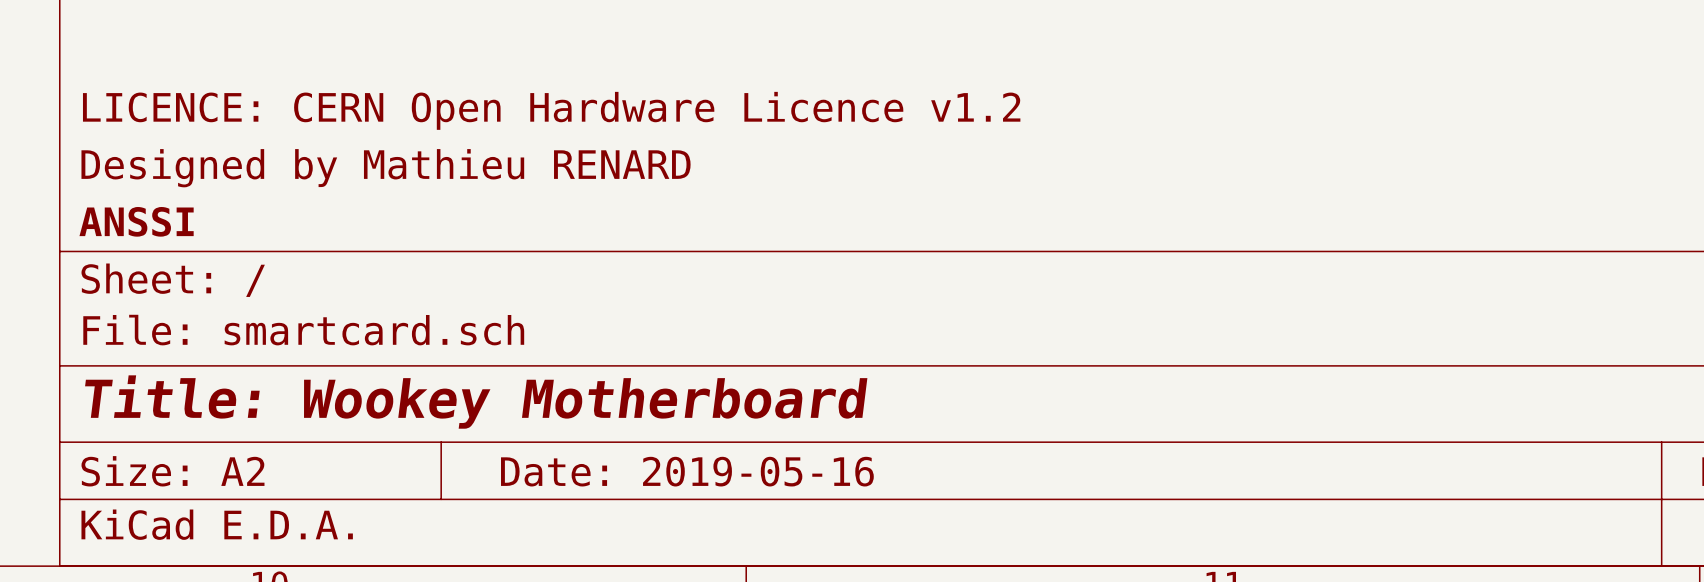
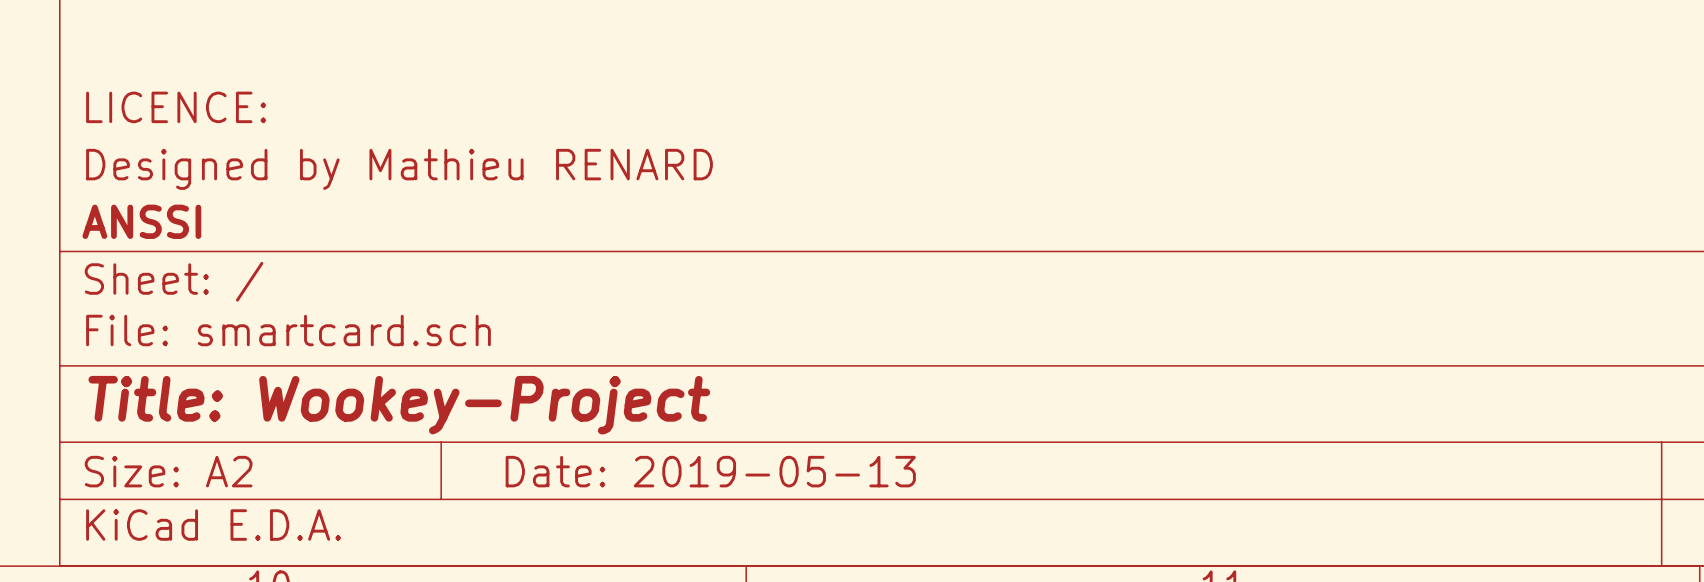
title block: LICENCE: CERN Open Hardware Licence v1.2 (551, 110) -> LICENCE: (176, 107)
title block: Title: Wookey Motherboard (476, 402) -> Title: Wookey-Project (399, 405)
title block: Date: 2019-05-16 (687, 471) -> Date: 2019-05-13 (710, 471)

